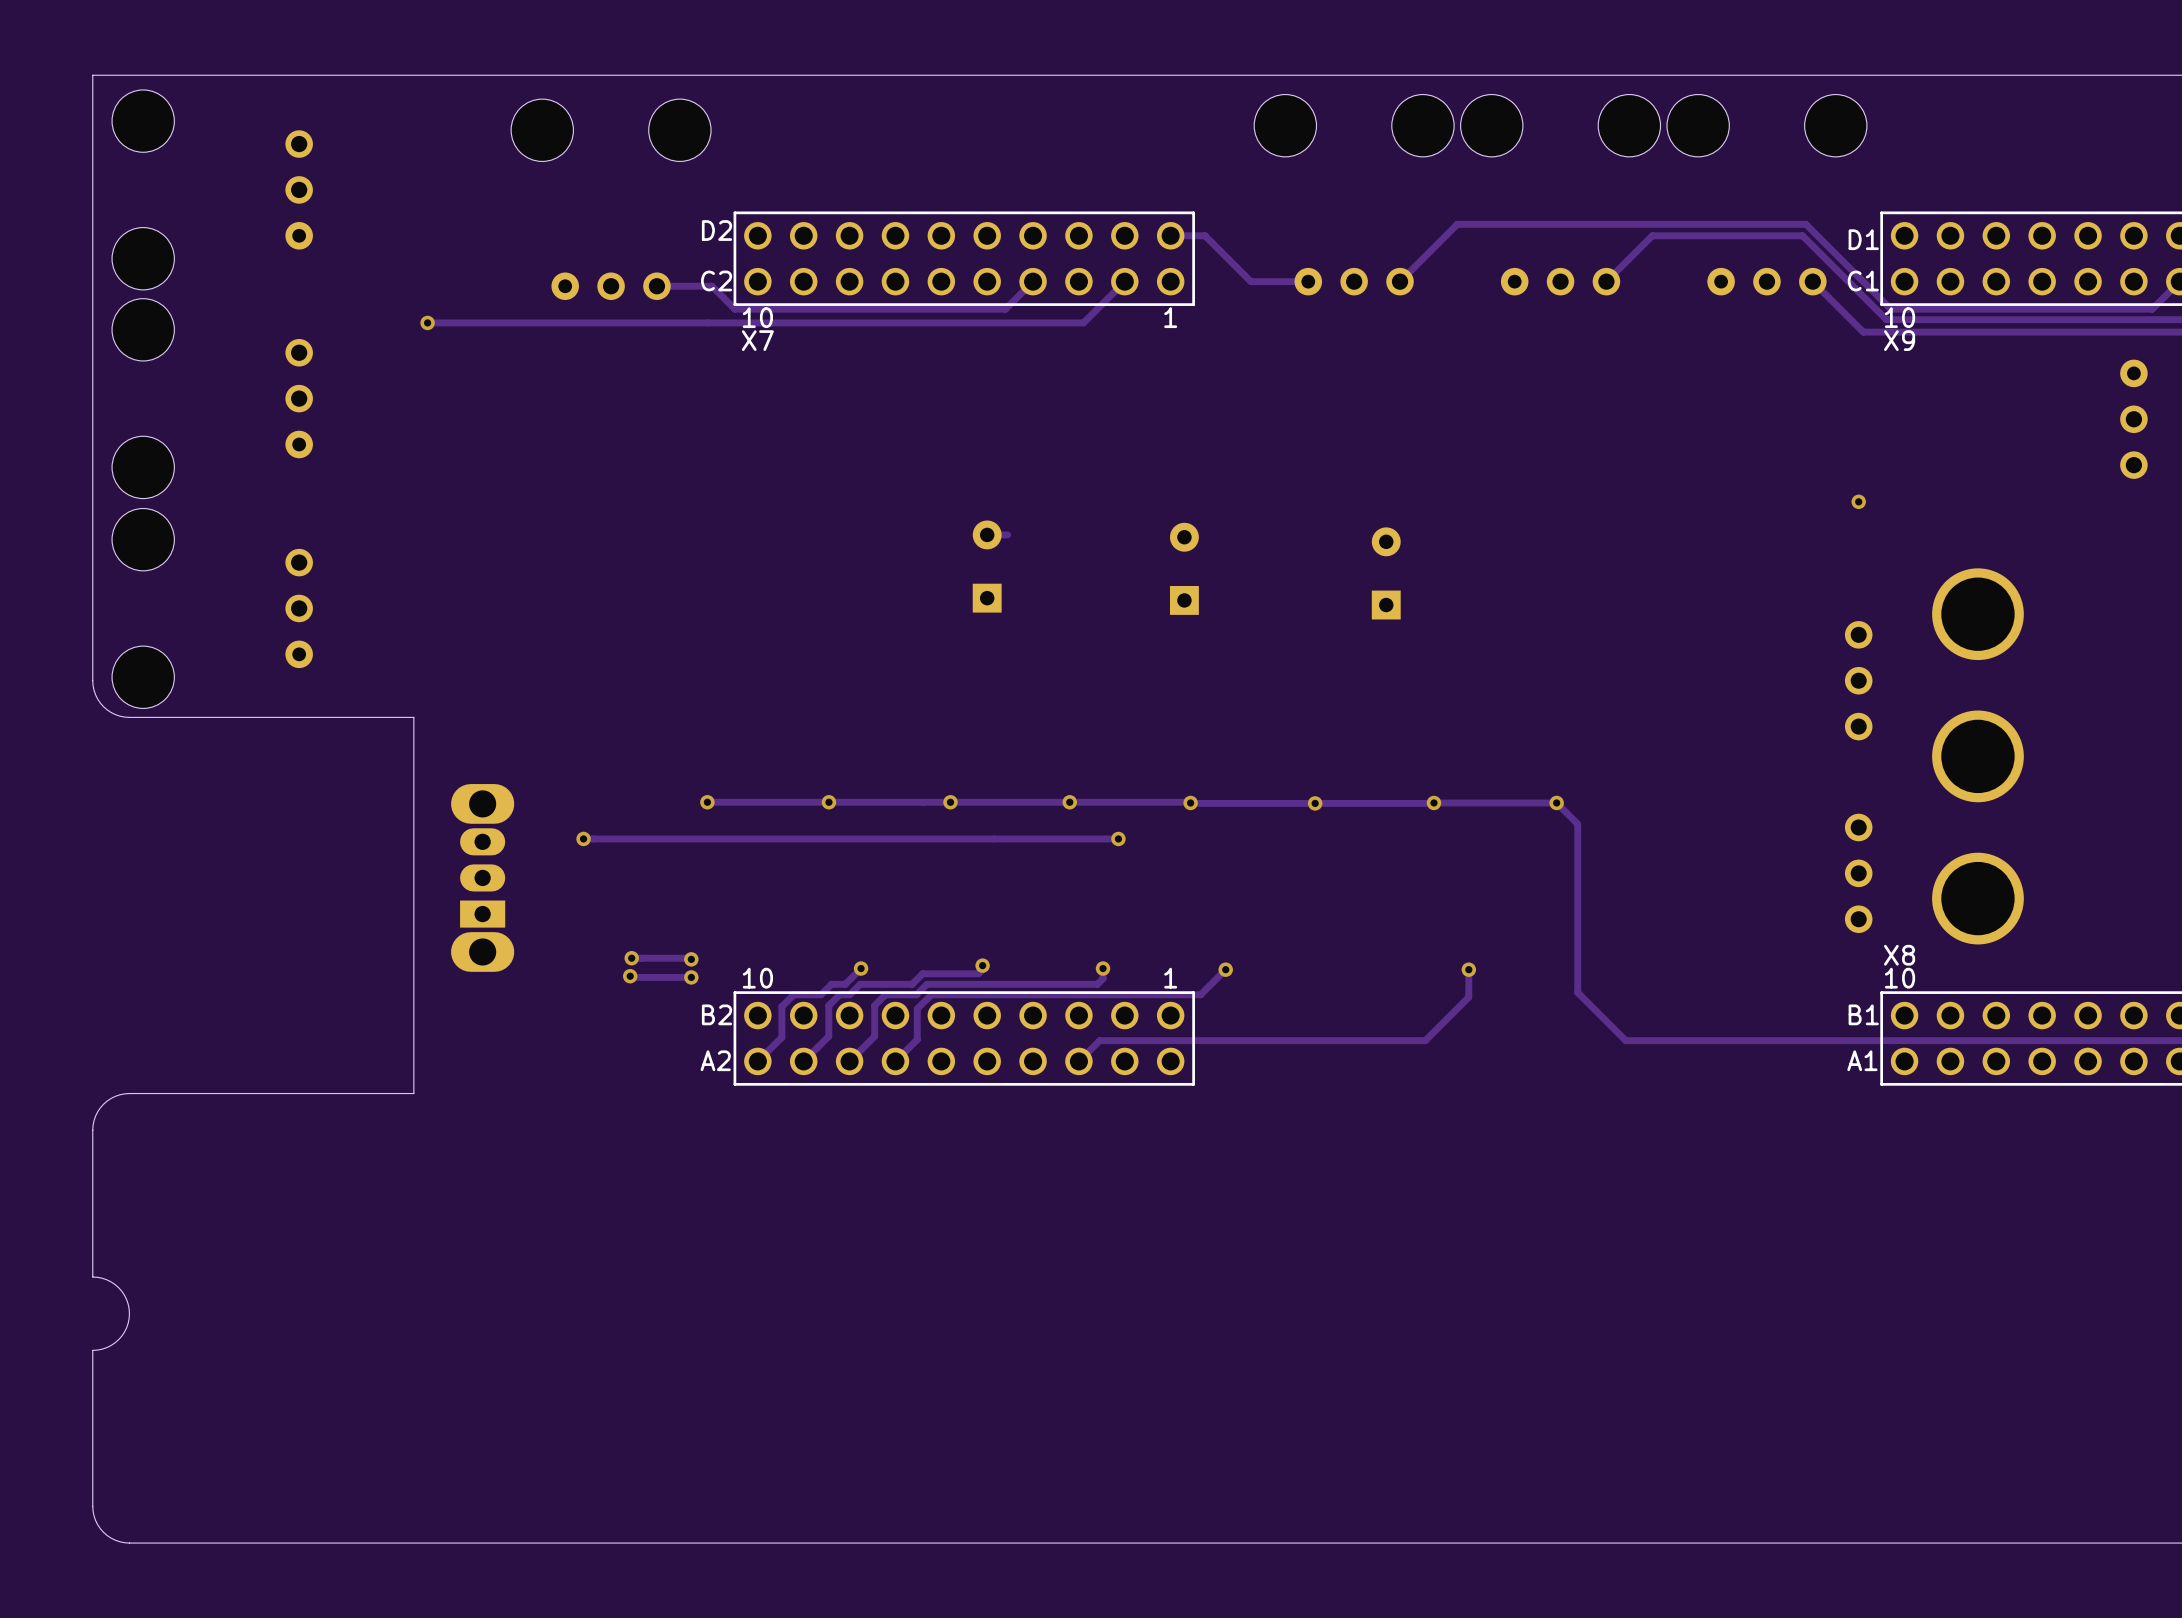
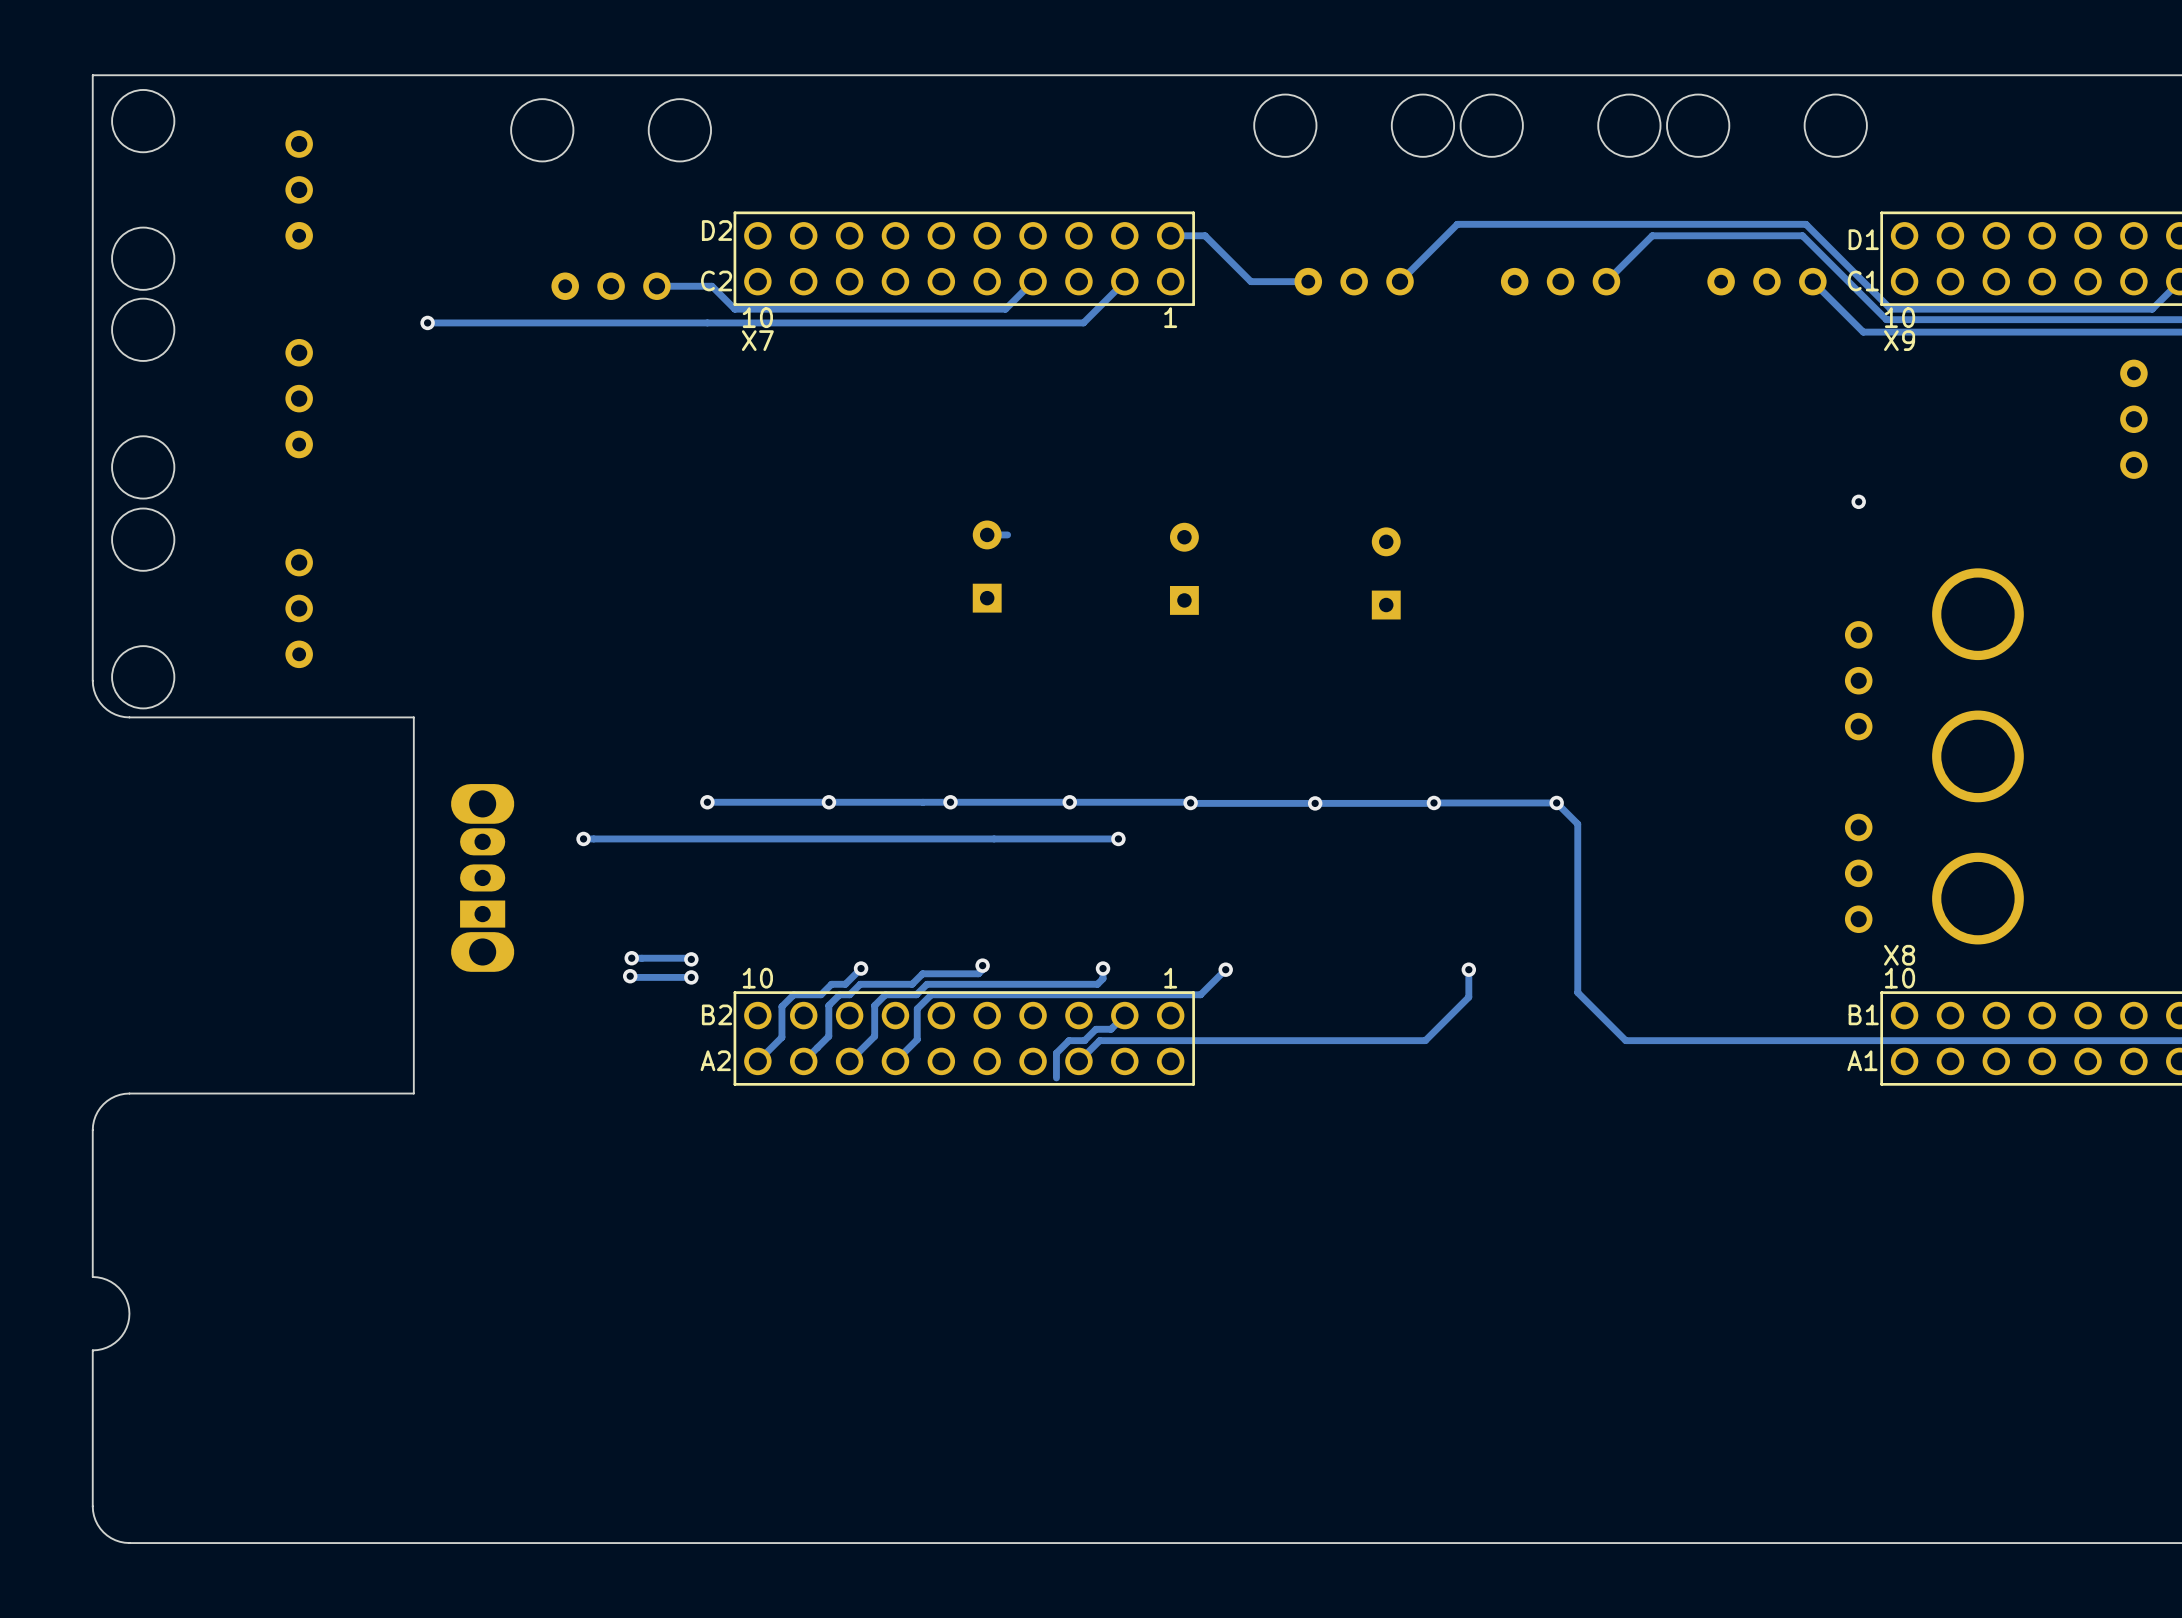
track: none -> (1124, 1015) (1111, 1029) (1095, 1029) (1084, 1040) (1068, 1040) (1056, 1053) (1056, 1077)

